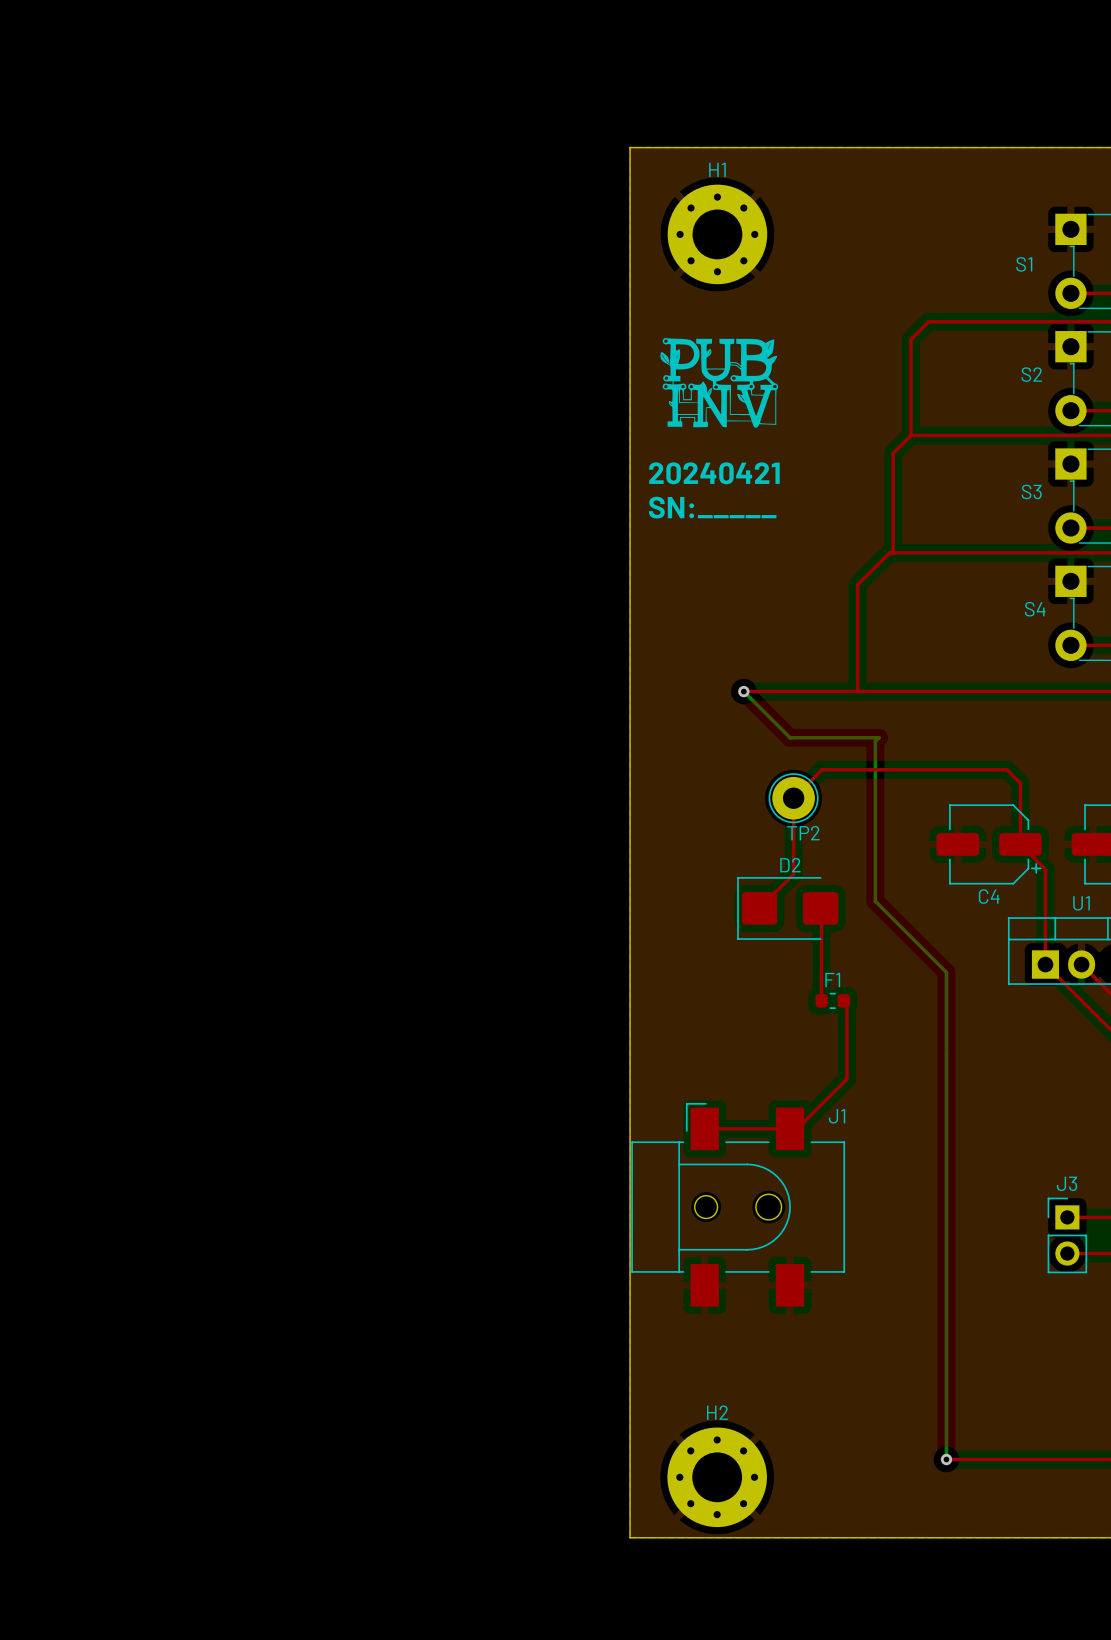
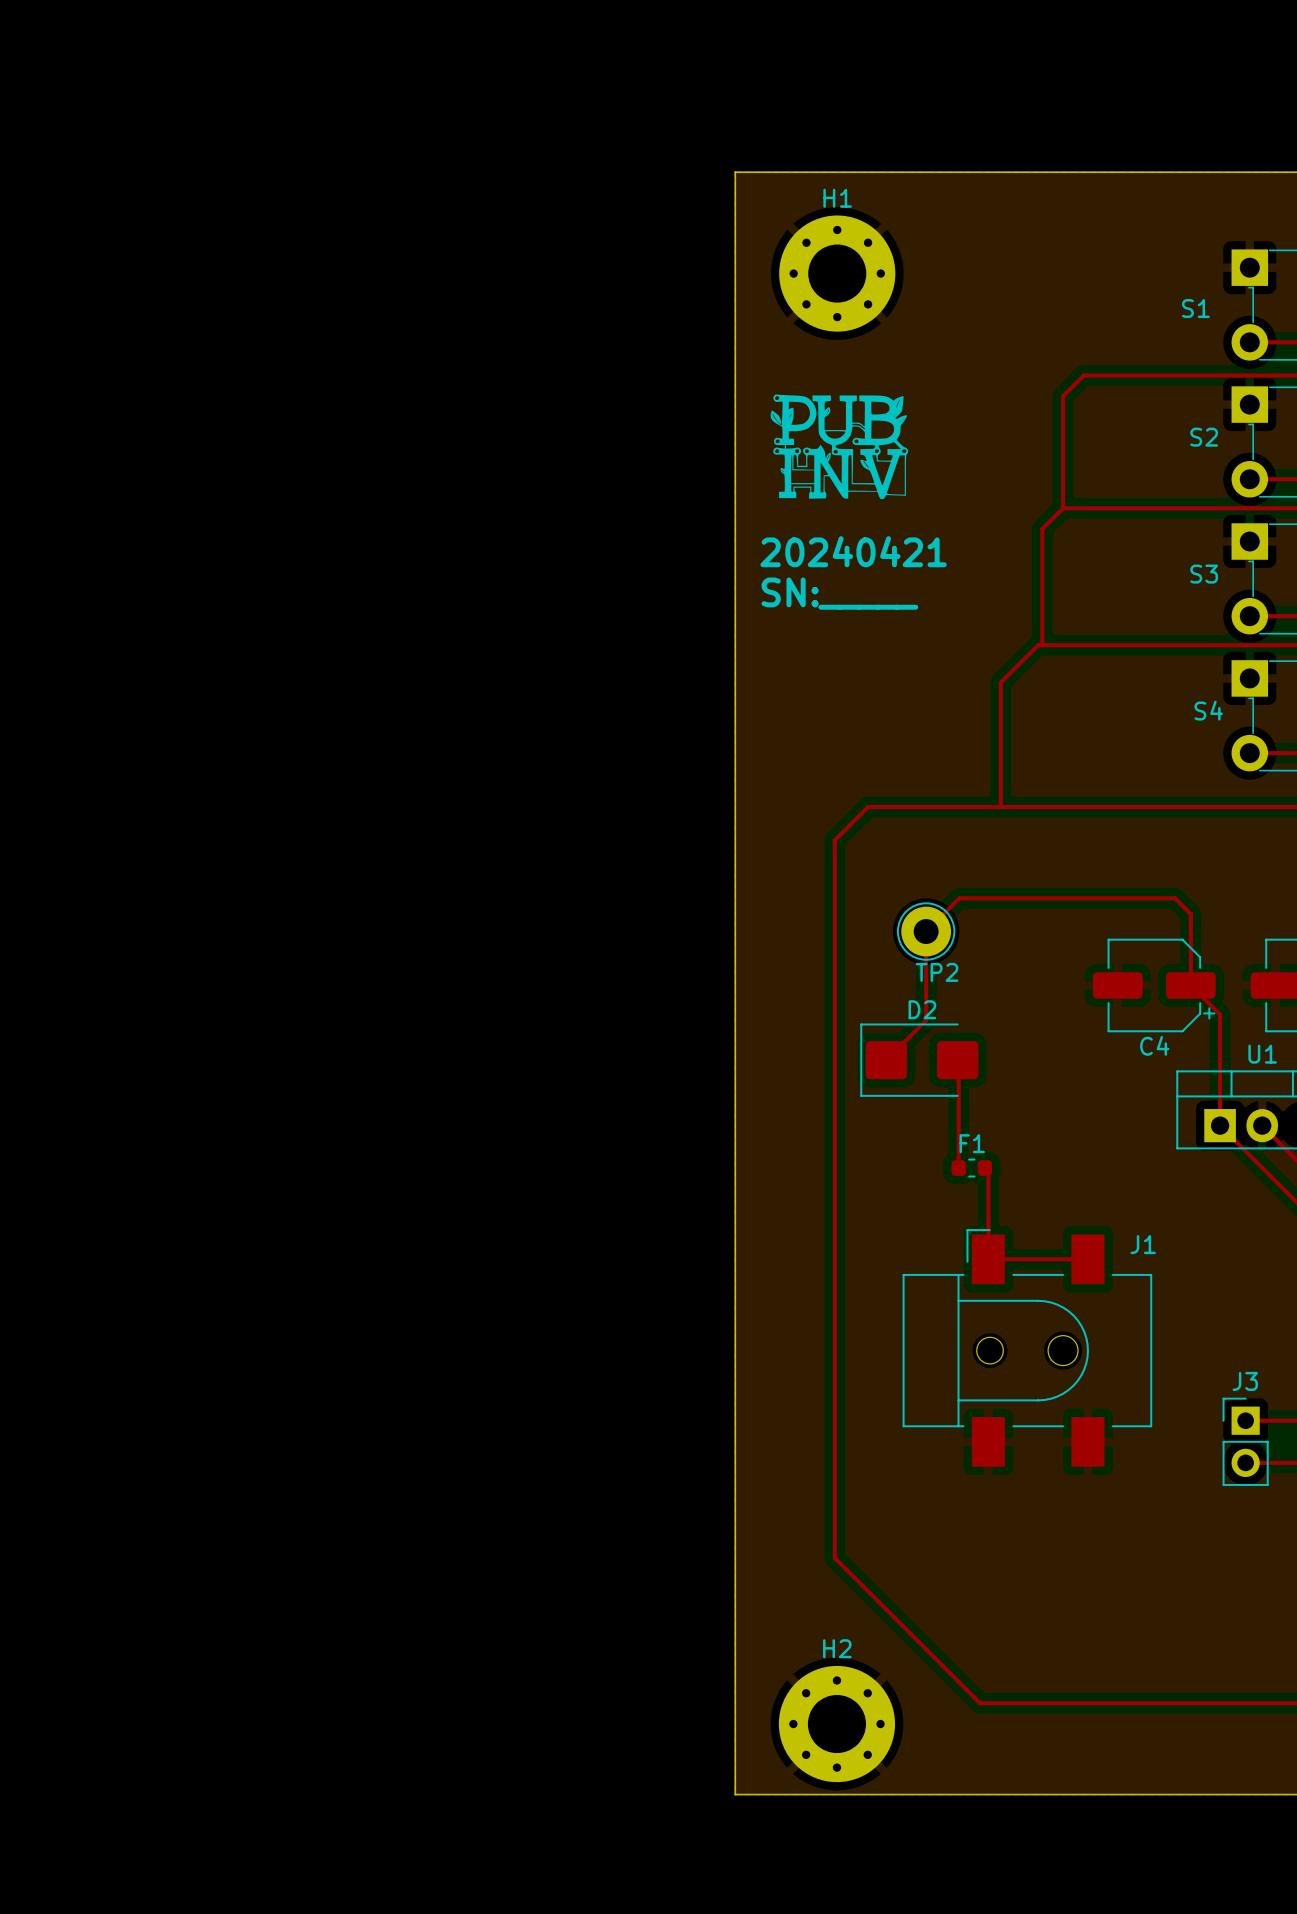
top track: none -> (868, 807) (834, 840) (834, 1558) (980, 1703) (1104, 1703)
bottom track: (743, 691) (790, 737) (878, 737) (875, 741) (875, 901) (946, 972) (946, 1455) -> none
via: (743, 691) -> none
top track: (846, 1079) (797, 1128) (704, 1128) -> (988, 1259) (1087, 1259)
J1 position: (738, 1204) -> (1027, 1347)
via: (946, 1459) -> none

